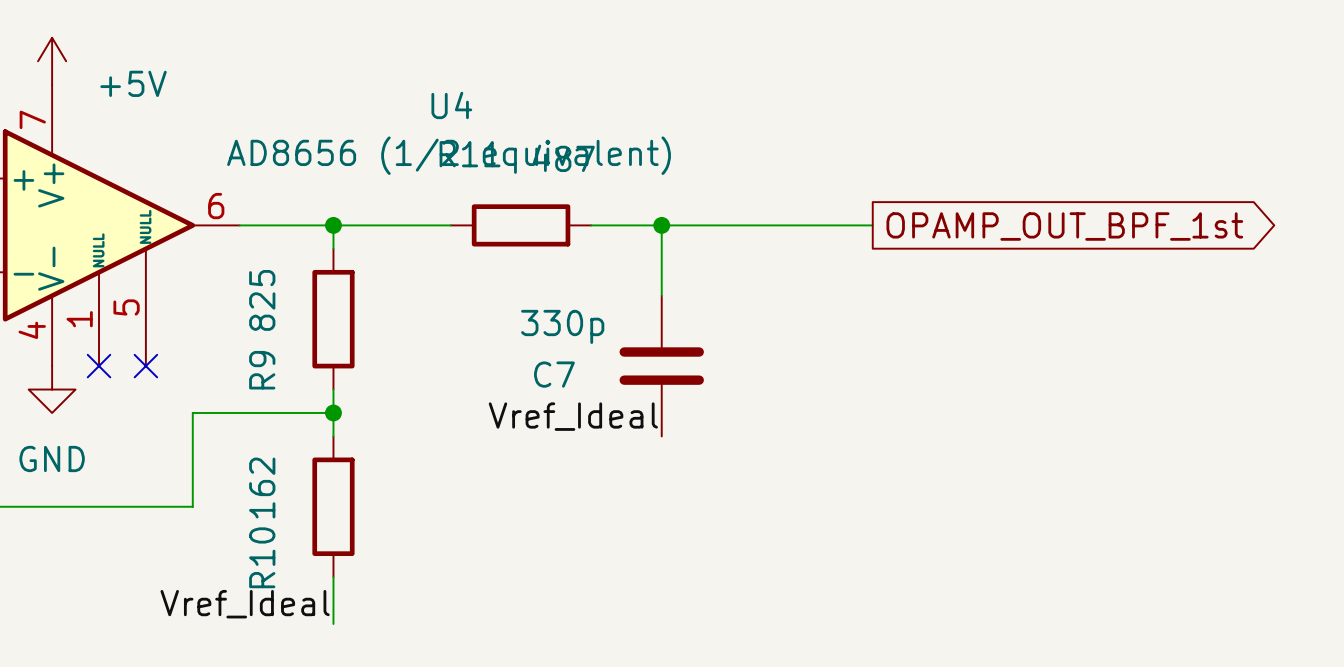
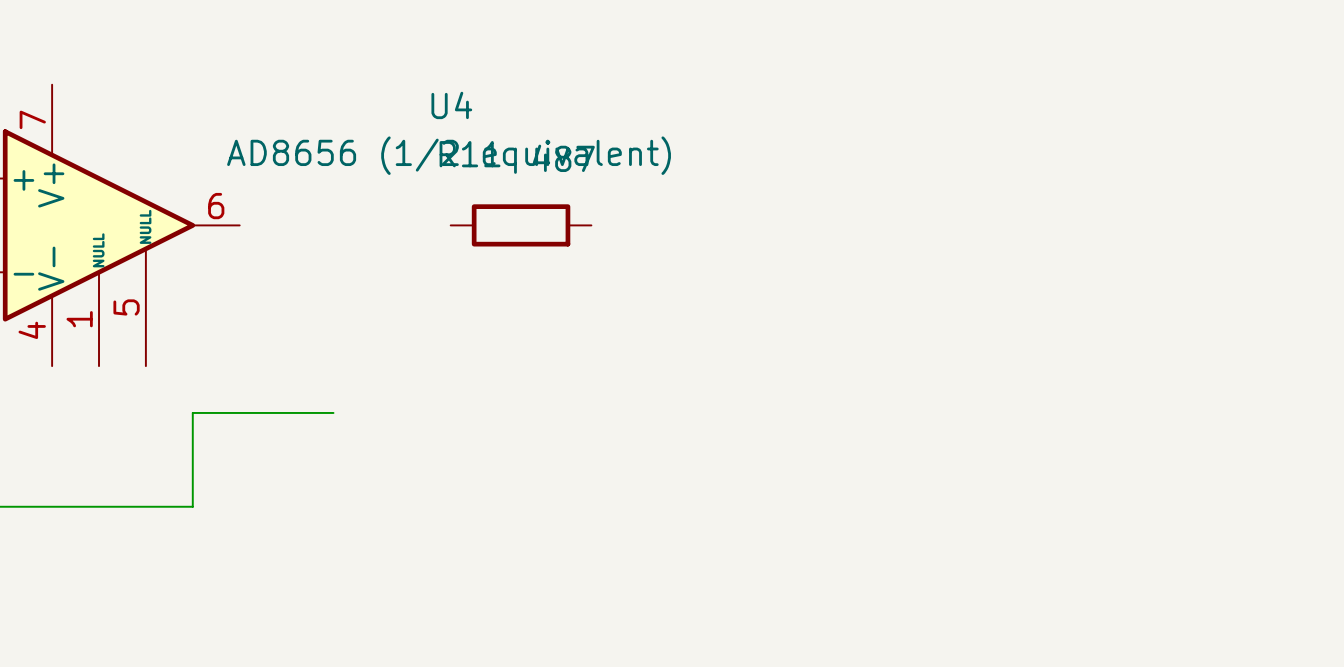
power symbol: +5V (52, 61) -> none
wire: (239, 225) (450, 225) -> none
wire: (333, 225) (333, 248) -> none
junction: (333, 225) -> none
wire: (591, 225) (872, 225) -> none
wire: (661, 225) (661, 295) -> none
junction: (661, 225) -> none
global label: OPAMP_OUT_BPF_1st (1064, 226) -> none
R9: 825 (333, 319) -> none
no-connect mark: (99, 366) -> none
no-connect mark: (145, 366) -> none
C7: 330p (661, 366) -> none
power symbol: GND (52, 389) -> none
wire: (333, 389) (333, 436) -> none
junction: (333, 412) -> none
label: Vref_Ideal (573, 416) -> none
R10: 162 (333, 506) -> none
wire: (333, 577) (333, 624) -> none
label: Vref_Ideal (245, 604) -> none

